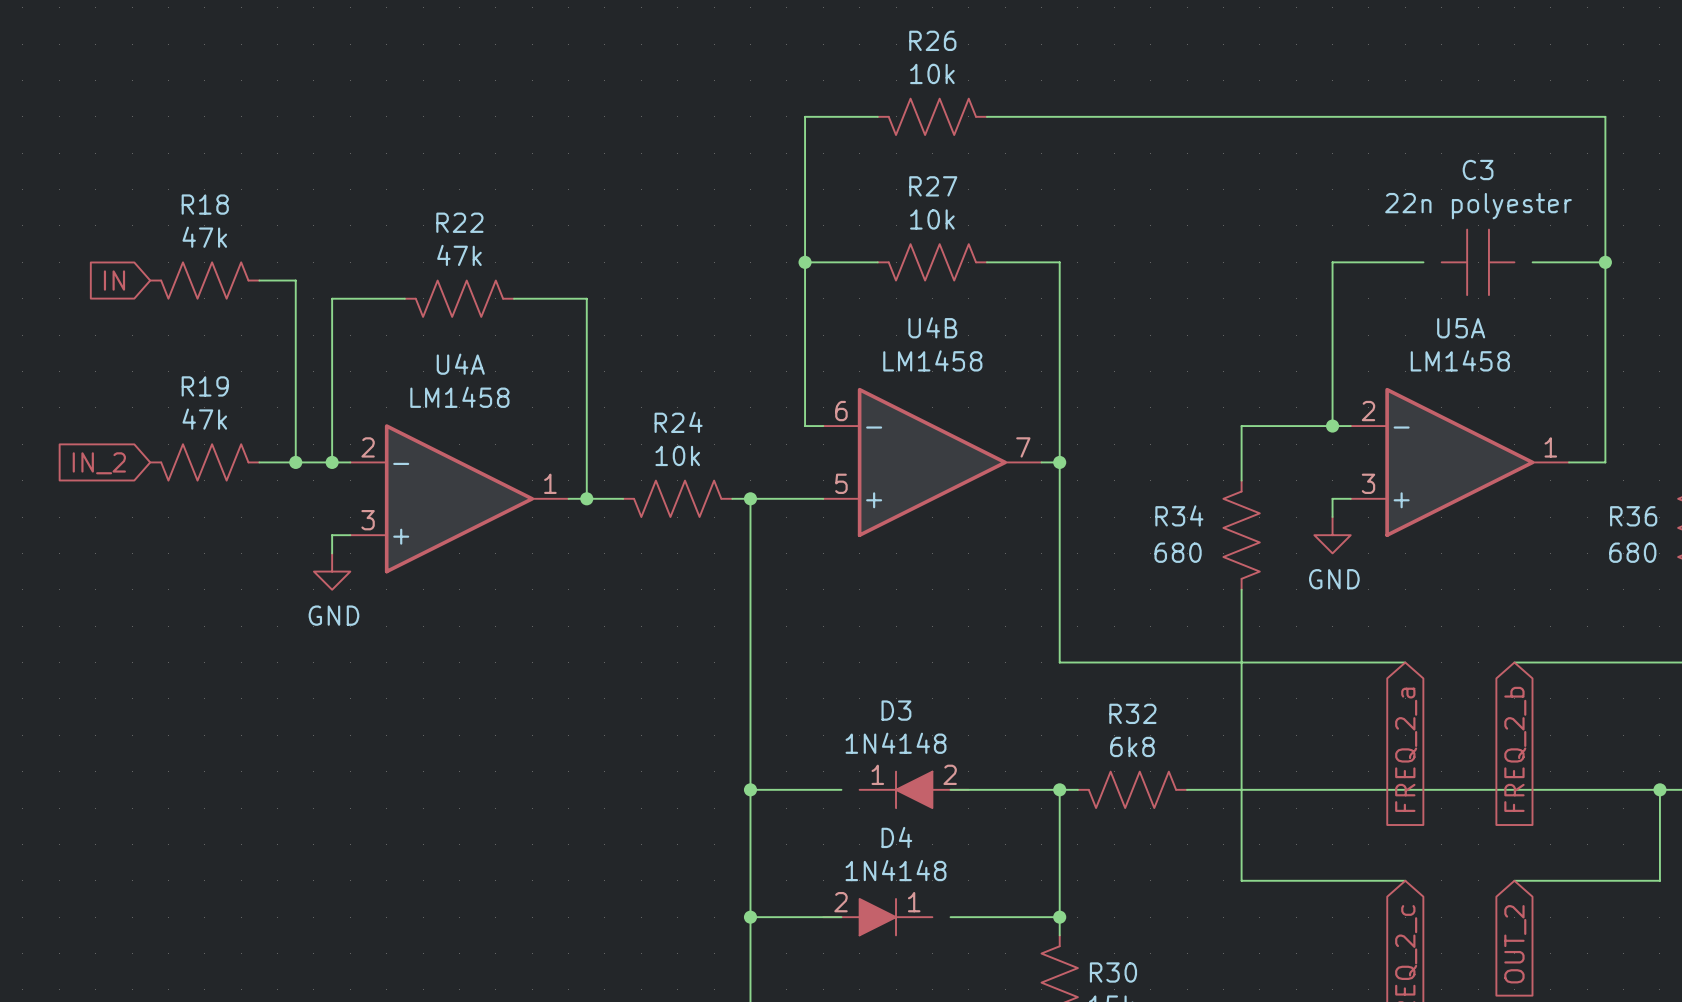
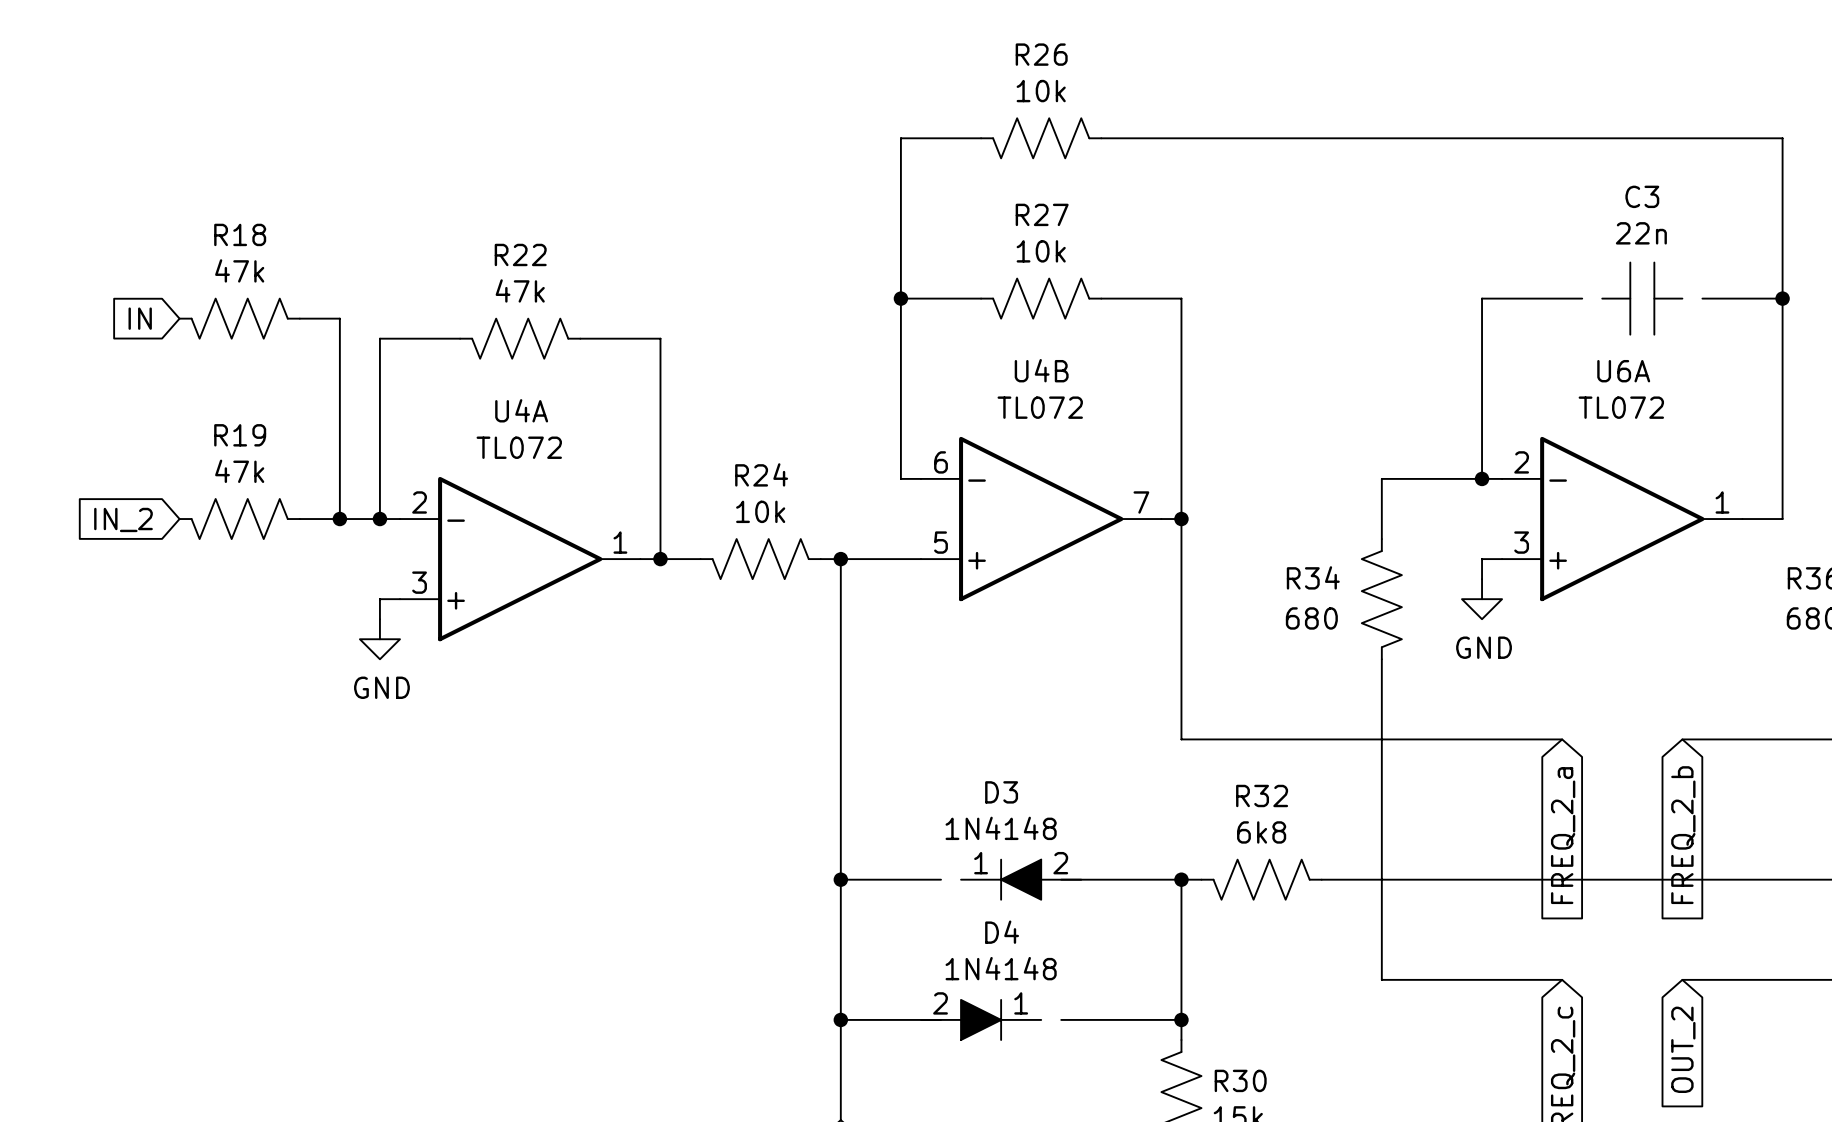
C3 value: 22n polyester (1478, 206) -> 22n (1641, 233)
U5A name: U5A (1461, 328) -> U6A (1623, 371)
U4B value: LM1458 (932, 360) -> TL072 (1040, 407)
U5A value: LM1458 (1460, 360) -> TL072 (1621, 407)
U4A value: LM1458 (459, 397) -> TL072 (519, 447)

